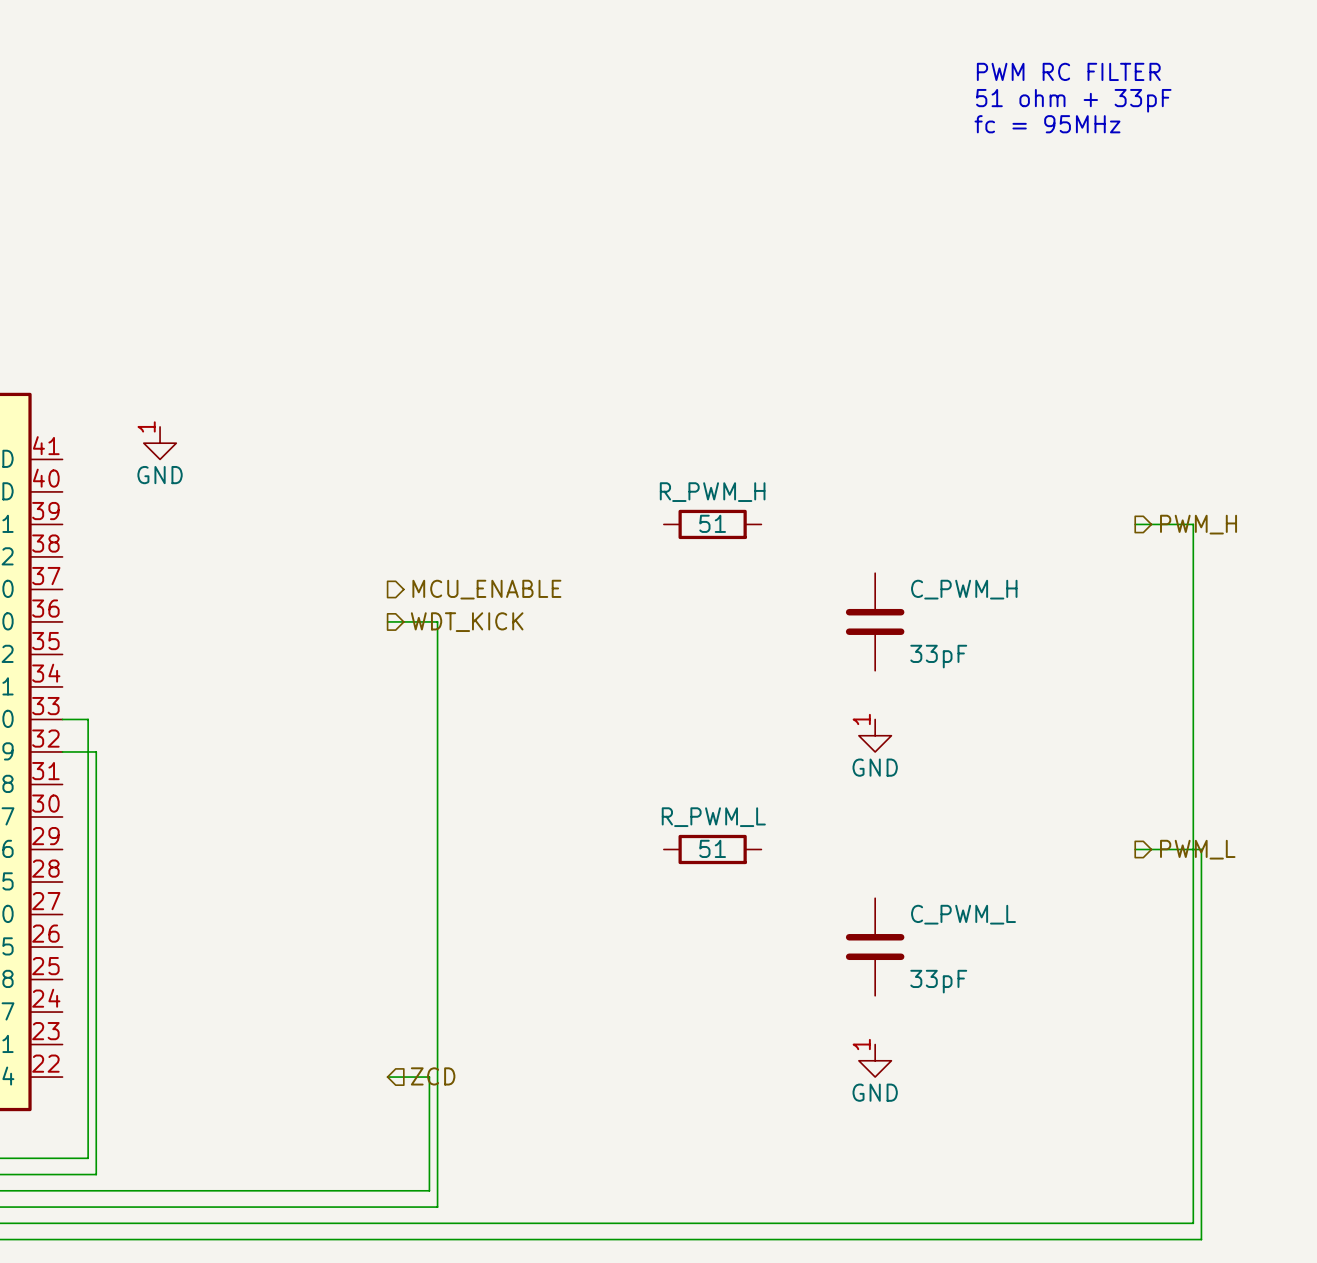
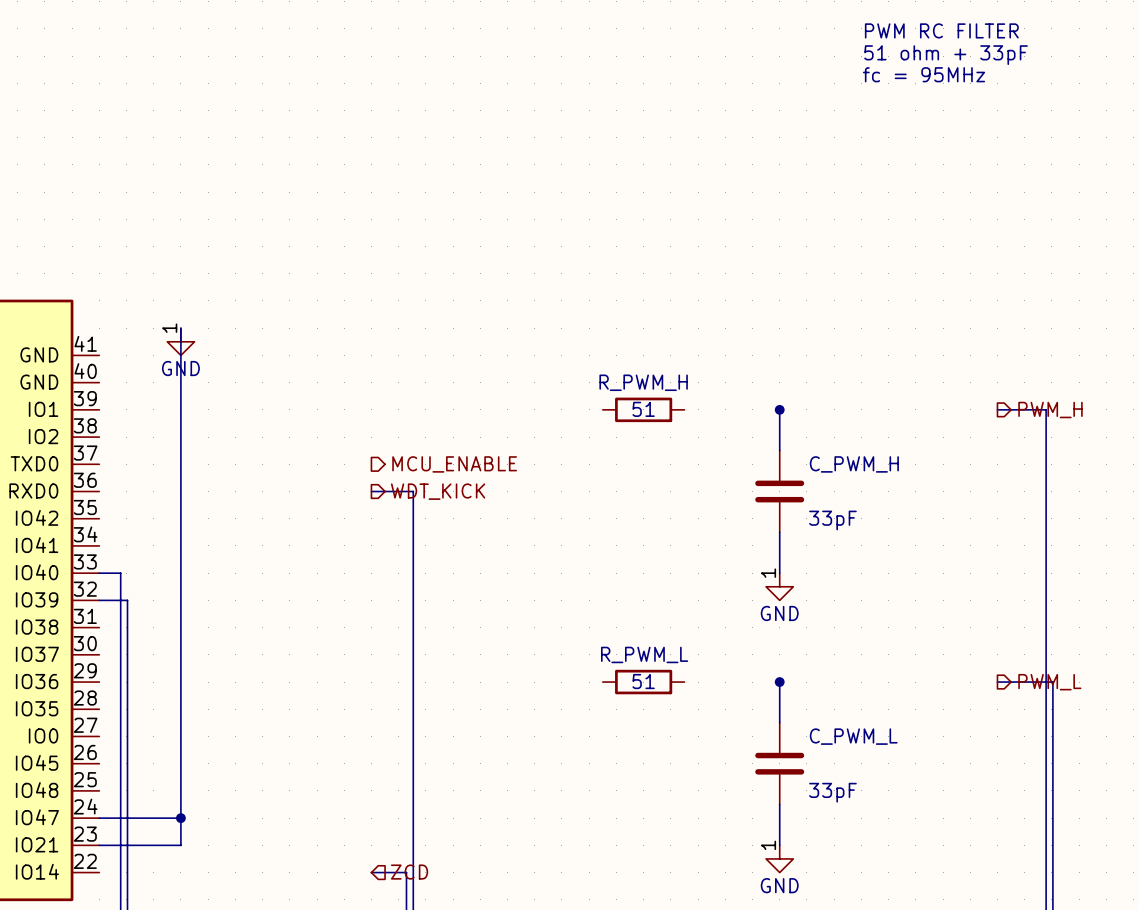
wire: none -> (180, 328) (180, 845) (99, 845)
wire: none -> (779, 409) (779, 450)
junction: none -> (779, 409)
wire: none -> (779, 532) (779, 573)
wire: none -> (779, 682) (779, 722)
junction: none -> (779, 682)
wire: none -> (779, 804) (779, 845)
wire: none -> (99, 818) (180, 818)
junction: none -> (180, 818)

